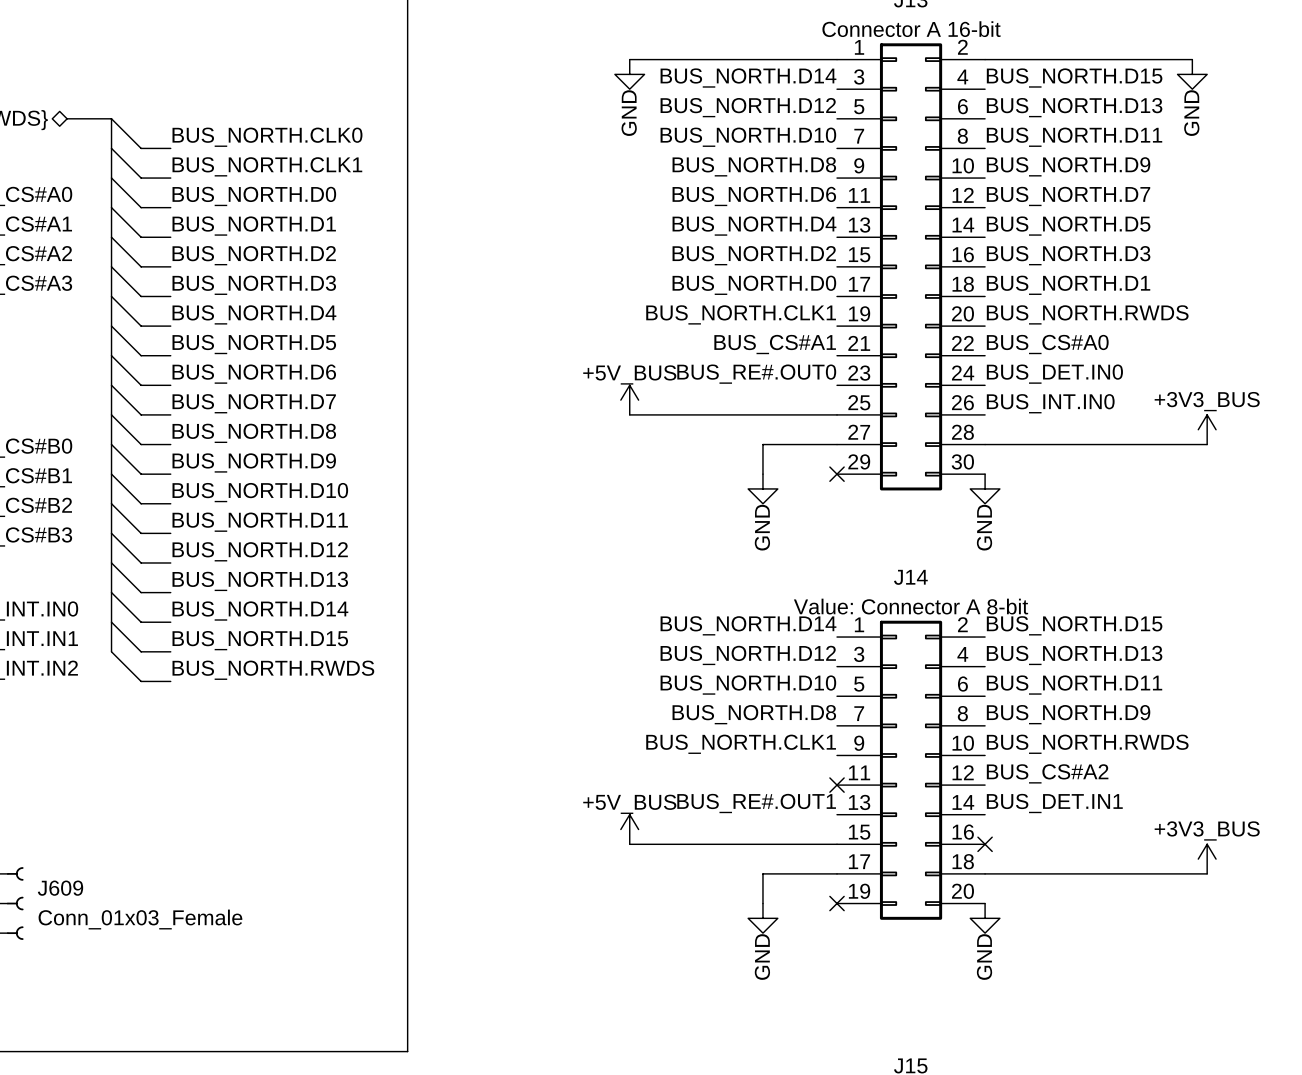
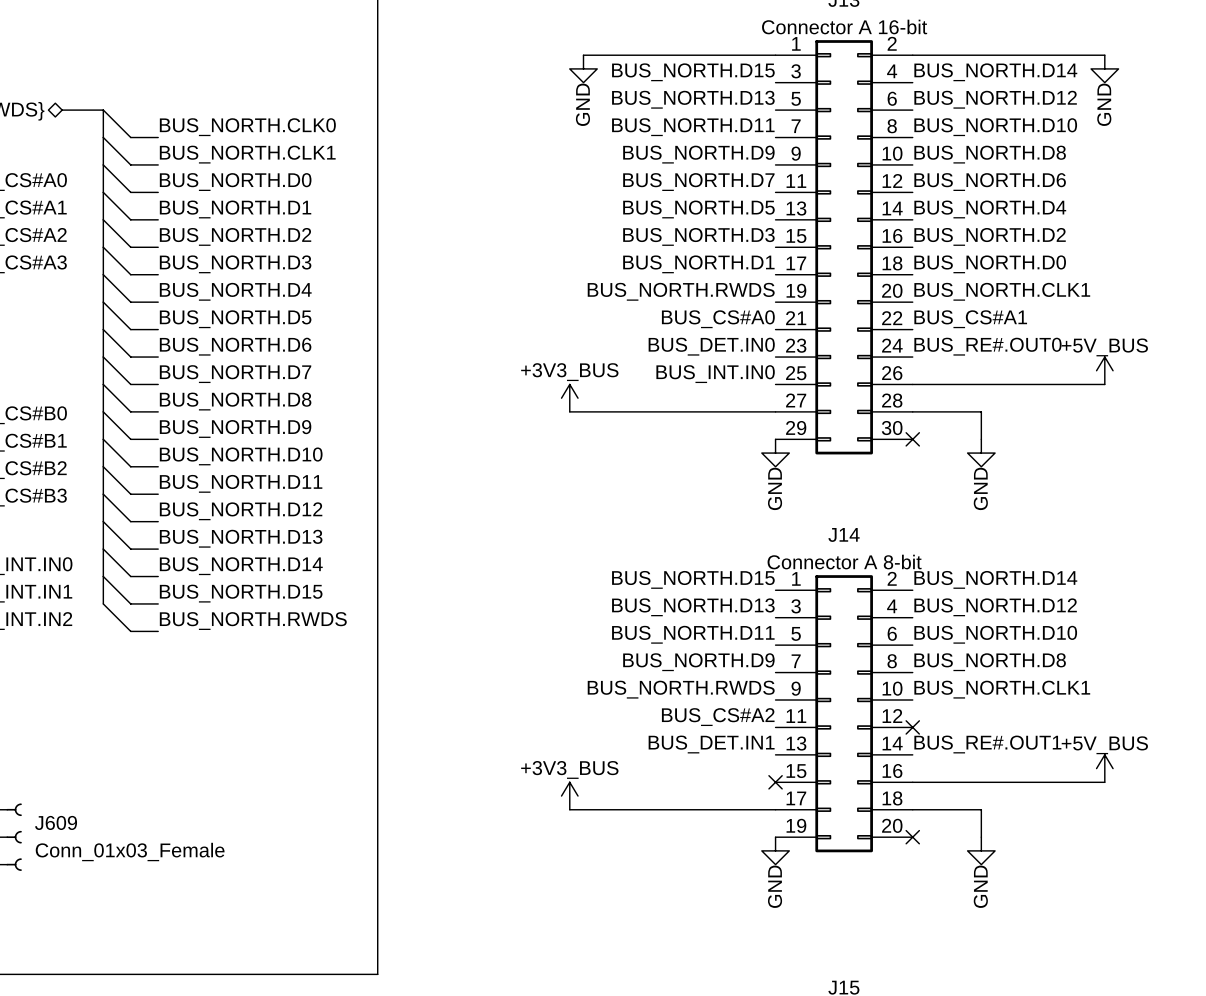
label: BUS_NORTH.D14 (748, 78) -> BUS_NORTH.D15 (693, 72)
label: BUS_NORTH.D15 (1074, 78) -> BUS_NORTH.D14 (995, 72)
label: BUS_NORTH.D12 (748, 107) -> BUS_NORTH.D13 (693, 99)
label: BUS_NORTH.D13 (1074, 107) -> BUS_NORTH.D12 (995, 99)
label: BUS_NORTH.D10 (748, 137) -> BUS_NORTH.D11 (693, 127)
label: BUS_NORTH.D11 (1074, 137) -> BUS_NORTH.D10 (995, 127)
label: BUS_NORTH.D8 (754, 166) -> BUS_NORTH.D9 (698, 154)
label: BUS_NORTH.D9 (1068, 166) -> BUS_NORTH.D8 (990, 154)
label: BUS_NORTH.D6 (754, 196) -> BUS_NORTH.D7 (698, 182)
label: BUS_NORTH.D7 (1068, 196) -> BUS_NORTH.D6 (990, 182)
label: BUS_NORTH.D4 (754, 226) -> BUS_NORTH.D5 (698, 209)
label: BUS_NORTH.D5 (1068, 226) -> BUS_NORTH.D4 (990, 209)
label: BUS_NORTH.D2 (754, 255) -> BUS_NORTH.D3 (698, 236)
label: BUS_NORTH.D3 (1068, 255) -> BUS_NORTH.D2 (990, 236)
label: BUS_NORTH.D0 (754, 285) -> BUS_NORTH.D1 (698, 264)
label: BUS_NORTH.D1 (1068, 285) -> BUS_NORTH.D0 (990, 264)
label: BUS_NORTH.CLK1 (741, 314) -> BUS_NORTH.RWDS (681, 291)
label: BUS_NORTH.RWDS (1087, 314) -> BUS_NORTH.CLK1 (1002, 291)
label: BUS_CS#A1 (775, 344) -> BUS_CS#A0 (718, 319)
label: BUS_CS#A0 (1047, 344) -> BUS_CS#A1 (970, 319)
label: BUS_RE#.OUT0 (756, 374) -> BUS_DET.IN0 (711, 346)
label: BUS_DET.IN0 (1054, 374) -> BUS_RE#.OUT0 (987, 346)
power symbol: +5V_BUS (629, 400) -> none
power symbol: none -> +5V_BUS (1104, 370)
label position: BUS_INT.IN0 (1050, 403) -> BUS_INT.IN0 (715, 374)
wire: (629, 414) (837, 414) -> none
wire: none -> (912, 384) (1104, 384)
power symbol: none -> +3V3_BUS (569, 398)
power symbol: +3V3_BUS (1207, 429) -> none
wire: (762, 444) (762, 474) -> (706, 411) (569, 411)
wire: (1059, 444) (1207, 444) -> (981, 411) (981, 439)
no-connect mark: (837, 474) -> none
no-connect mark: none -> (912, 439)
power symbol: GND (762, 488) -> none
power symbol: none -> GND (775, 453)
power symbol: GND (985, 488) -> none
power symbol: none -> GND (981, 453)
J14 value: Value: Connector A 8-bit (911, 606) -> Connector A 8-bit (844, 562)
label: BUS_NORTH.D14 (748, 625) -> BUS_NORTH.D15 (693, 579)
label: BUS_NORTH.D15 (1074, 625) -> BUS_NORTH.D14 (995, 579)
label: BUS_NORTH.D12 (748, 655) -> BUS_NORTH.D13 (693, 607)
label: BUS_NORTH.D13 (1074, 655) -> BUS_NORTH.D12 (995, 607)
label: BUS_NORTH.D10 (748, 685) -> BUS_NORTH.D11 (693, 634)
label: BUS_NORTH.D11 (1074, 685) -> BUS_NORTH.D10 (995, 634)
label: BUS_NORTH.D8 (754, 714) -> BUS_NORTH.D9 (698, 662)
label: BUS_NORTH.D9 (1068, 714) -> BUS_NORTH.D8 (990, 662)
label: BUS_NORTH.CLK1 (741, 744) -> BUS_NORTH.RWDS (681, 689)
label: BUS_NORTH.RWDS (1087, 744) -> BUS_NORTH.CLK1 (1002, 689)
label position: BUS_CS#A2 (1047, 773) -> BUS_CS#A2 (718, 717)
no-connect mark: (837, 785) -> none
no-connect mark: none -> (912, 727)
label: BUS_RE#.OUT1 (756, 803) -> BUS_DET.IN1 (711, 744)
label: BUS_DET.IN1 (1054, 803) -> BUS_RE#.OUT1 (987, 744)
power symbol: +5V_BUS (629, 829) -> none
power symbol: none -> +5V_BUS (1104, 768)
wire: (629, 844) (837, 844) -> none
no-connect mark: none -> (775, 782)
wire: none -> (912, 782) (1104, 782)
no-connect mark: (985, 844) -> none
power symbol: none -> +3V3_BUS (569, 796)
power symbol: +3V3_BUS (1207, 859) -> none
wire: (762, 873) (762, 903) -> (706, 809) (569, 809)
wire: (1059, 873) (1207, 873) -> (981, 809) (981, 837)
no-connect mark: (837, 903) -> none
no-connect mark: none -> (912, 837)
power symbol: GND (762, 918) -> none
power symbol: none -> GND (775, 850)
power symbol: GND (985, 918) -> none
power symbol: none -> GND (981, 850)

